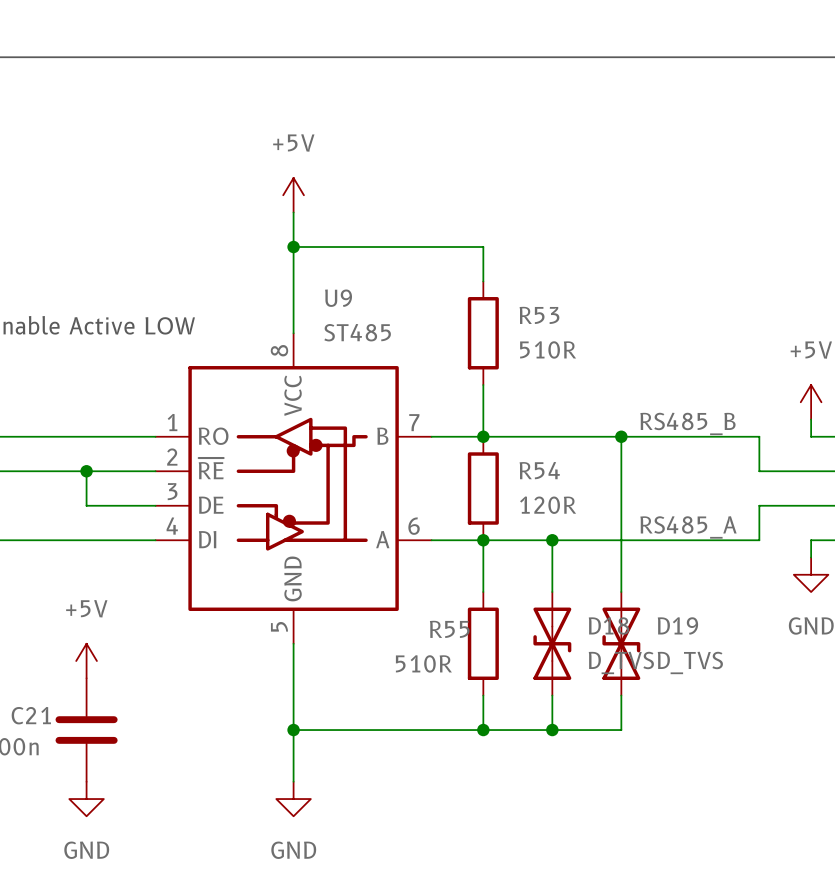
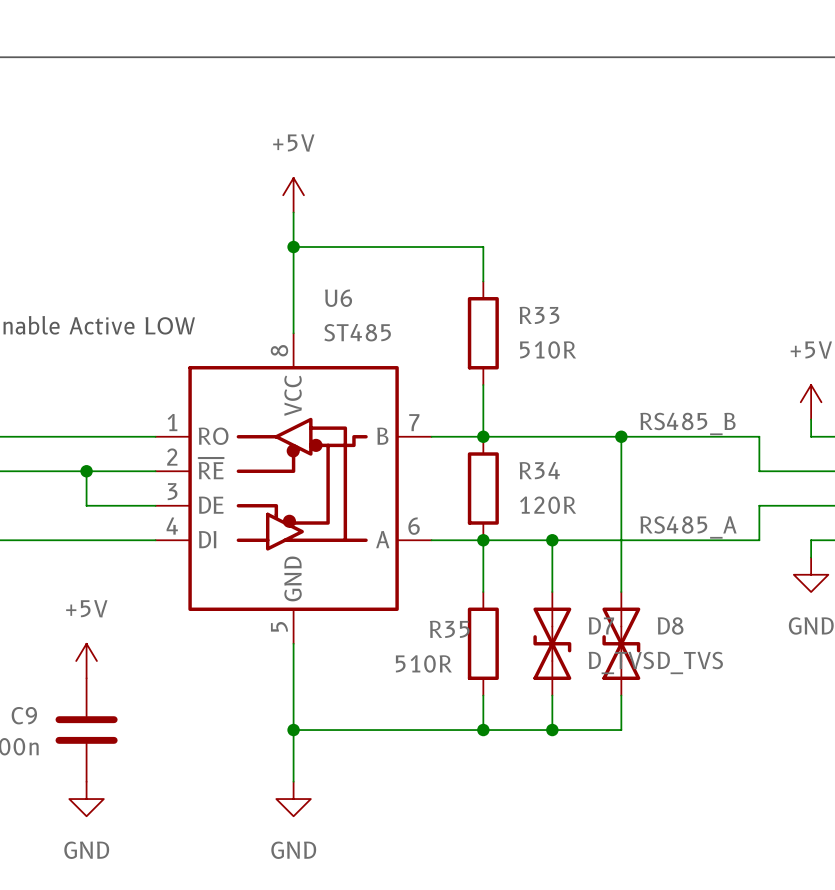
U9 name: U9 (338, 298) -> U6 (338, 298)
R53 name: R53 (539, 315) -> R33 (539, 315)
R54 name: R54 (539, 470) -> R34 (539, 470)
D18 name: D18 (608, 625) -> D7 (601, 625)
D19 name: D19 (677, 625) -> D8 (670, 625)
R55 name: R55 (449, 629) -> R35 (449, 629)
C21 name: C21 (31, 715) -> C9 (24, 715)

